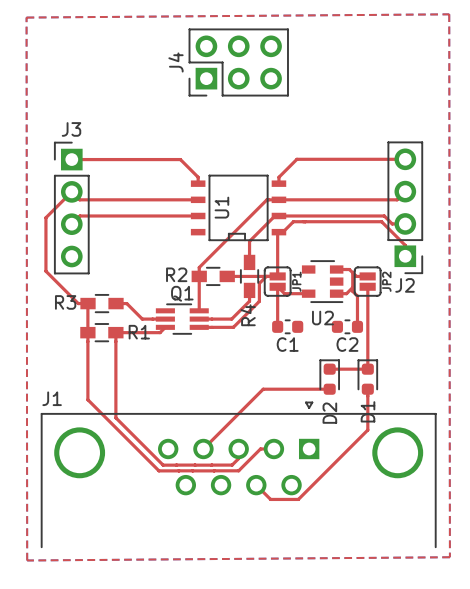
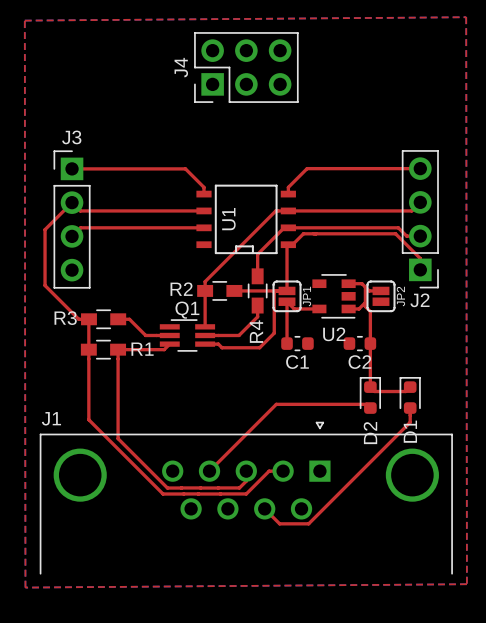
top track: (265, 277) (259, 283) (259, 301) (233, 327) (211, 327) -> (274, 291) (274, 333) (259, 347) (222, 347) (218, 344)
top track: (367, 286) (367, 369) (329, 369) -> none
top track: none -> (370, 343) (370, 387) (374, 391) (405, 391) (410, 387)
D2 position: (329, 377) -> (370, 395)
D1 position: (367, 377) -> (410, 395)
top track: (263, 389) (329, 389) -> (271, 408) (276, 404) (366, 404) (370, 408)
top track: (367, 389) (367, 430) -> (410, 408) (410, 422) (381, 451)

